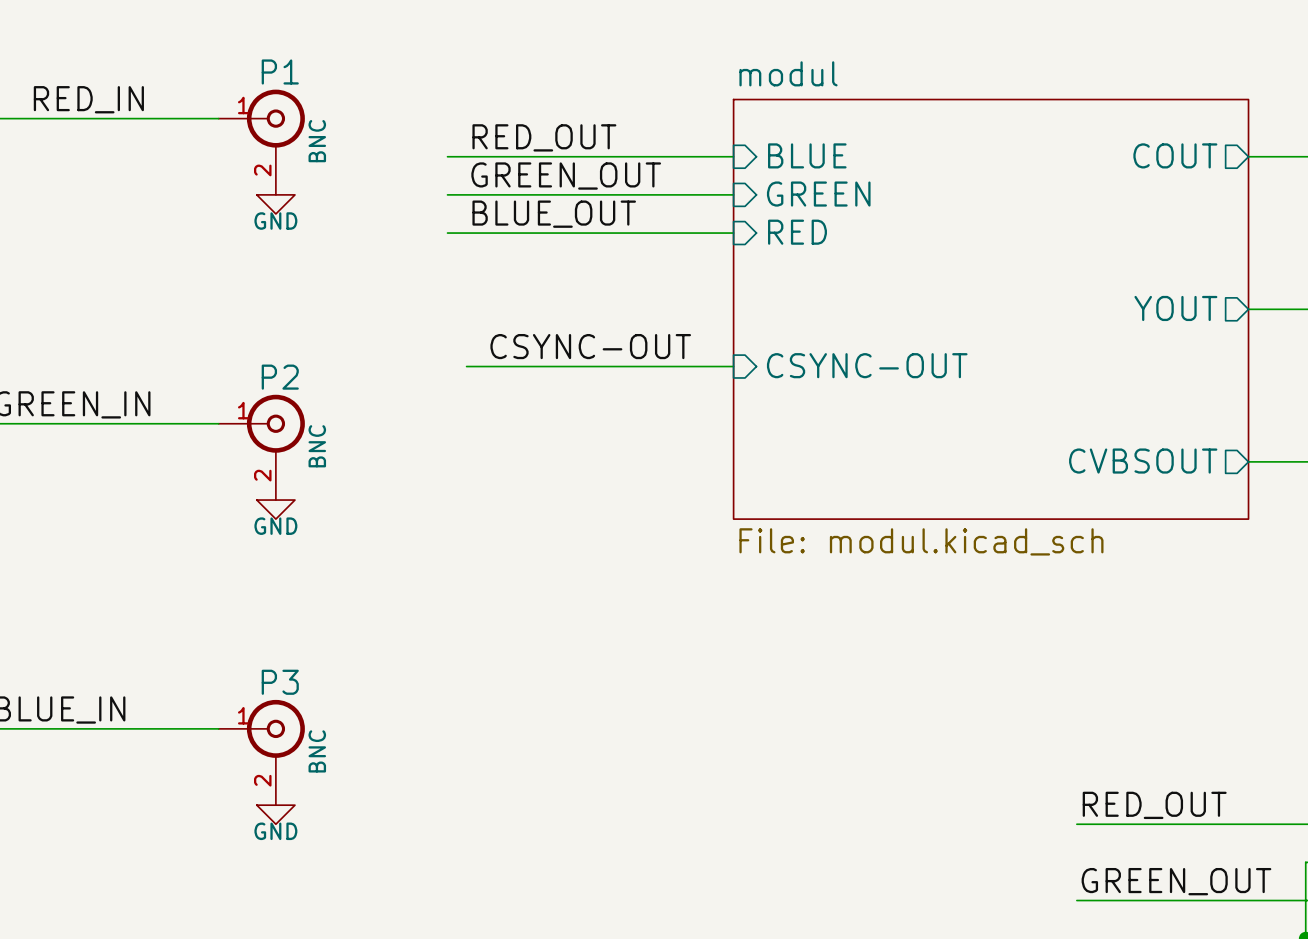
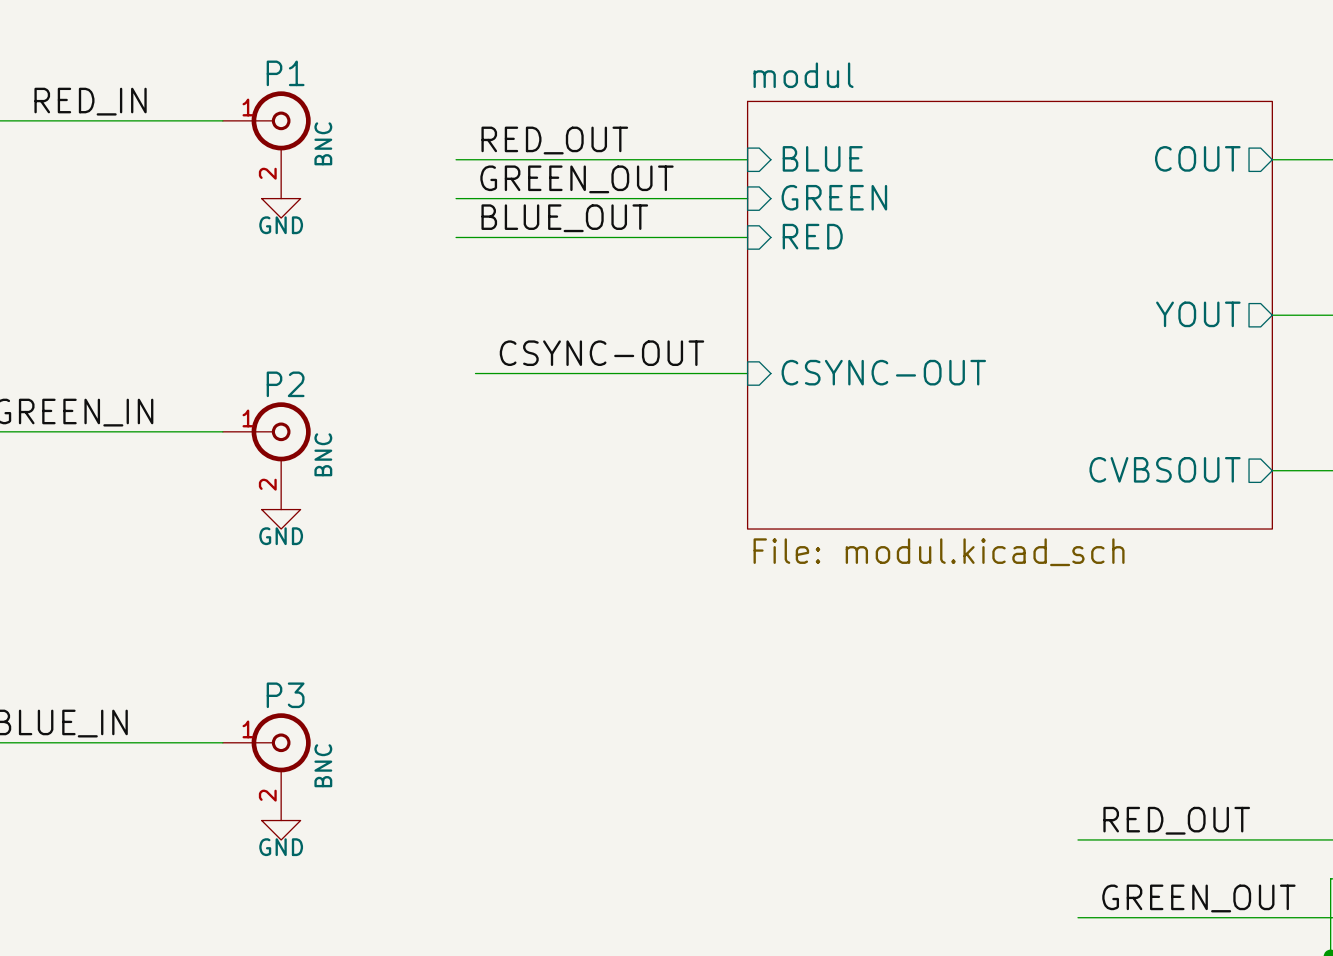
wire: none -> (1077, 839) (1097, 839)
wire: none -> (1077, 917) (1097, 917)

